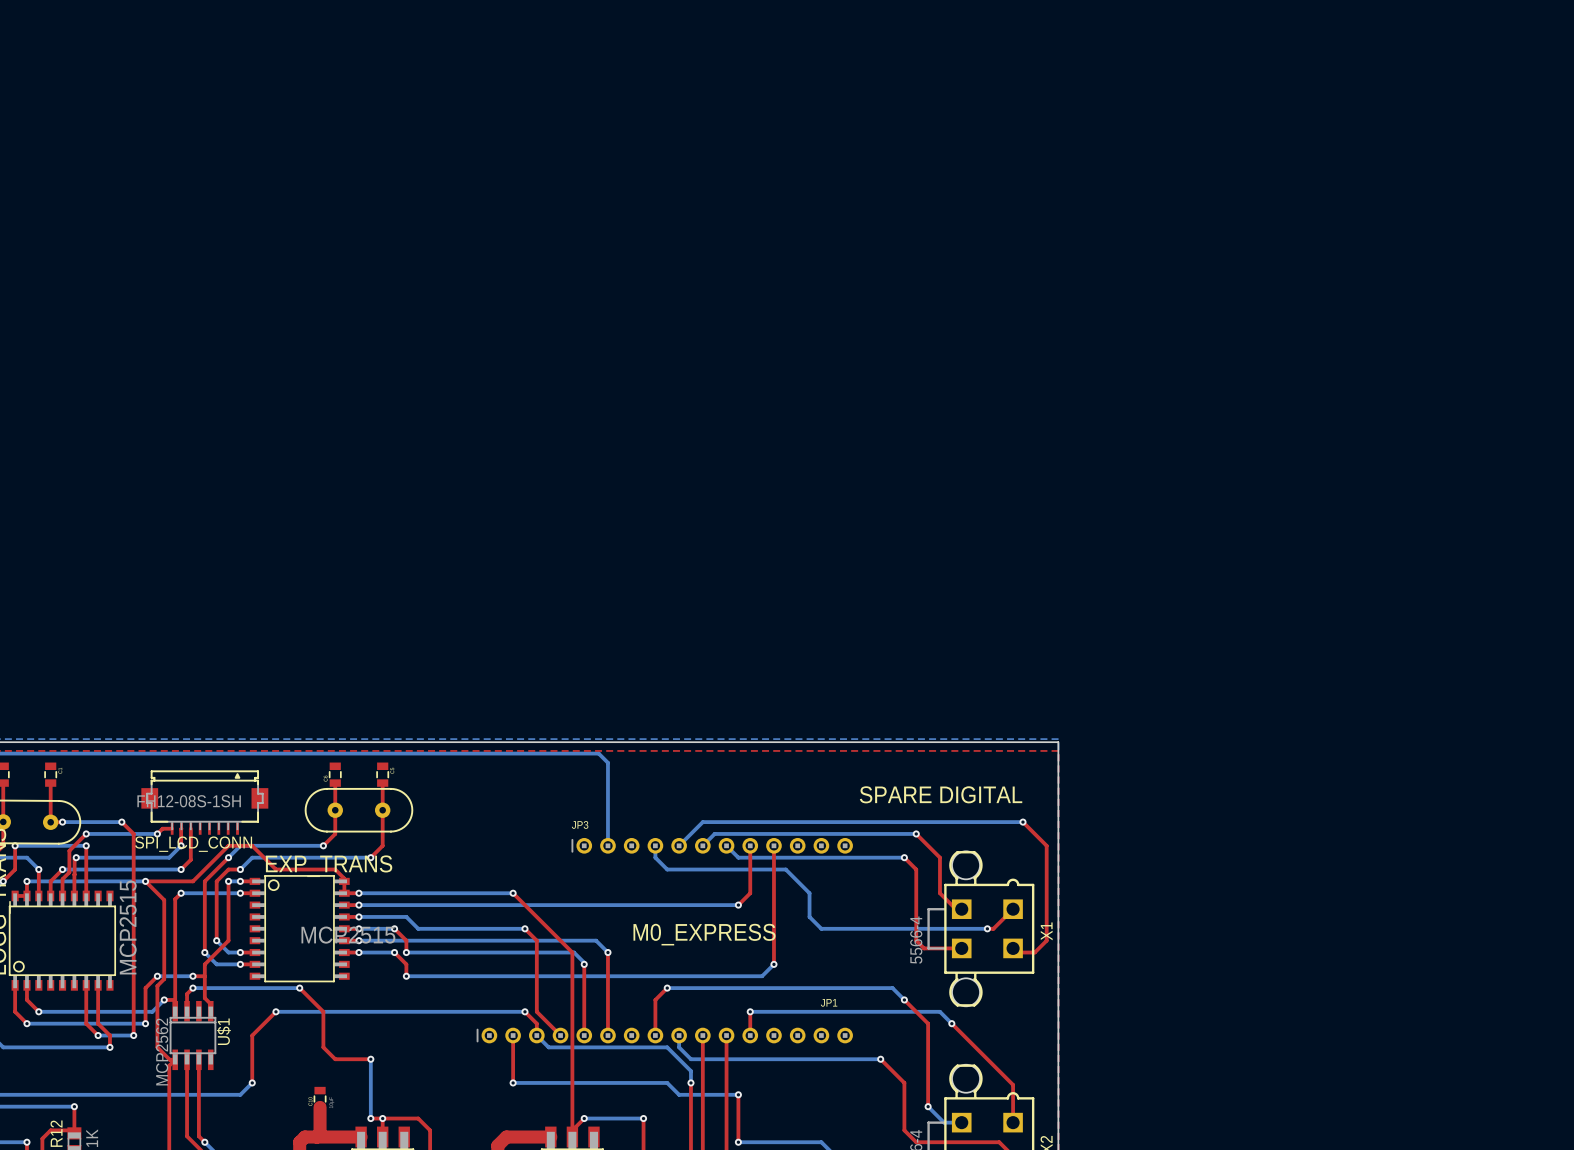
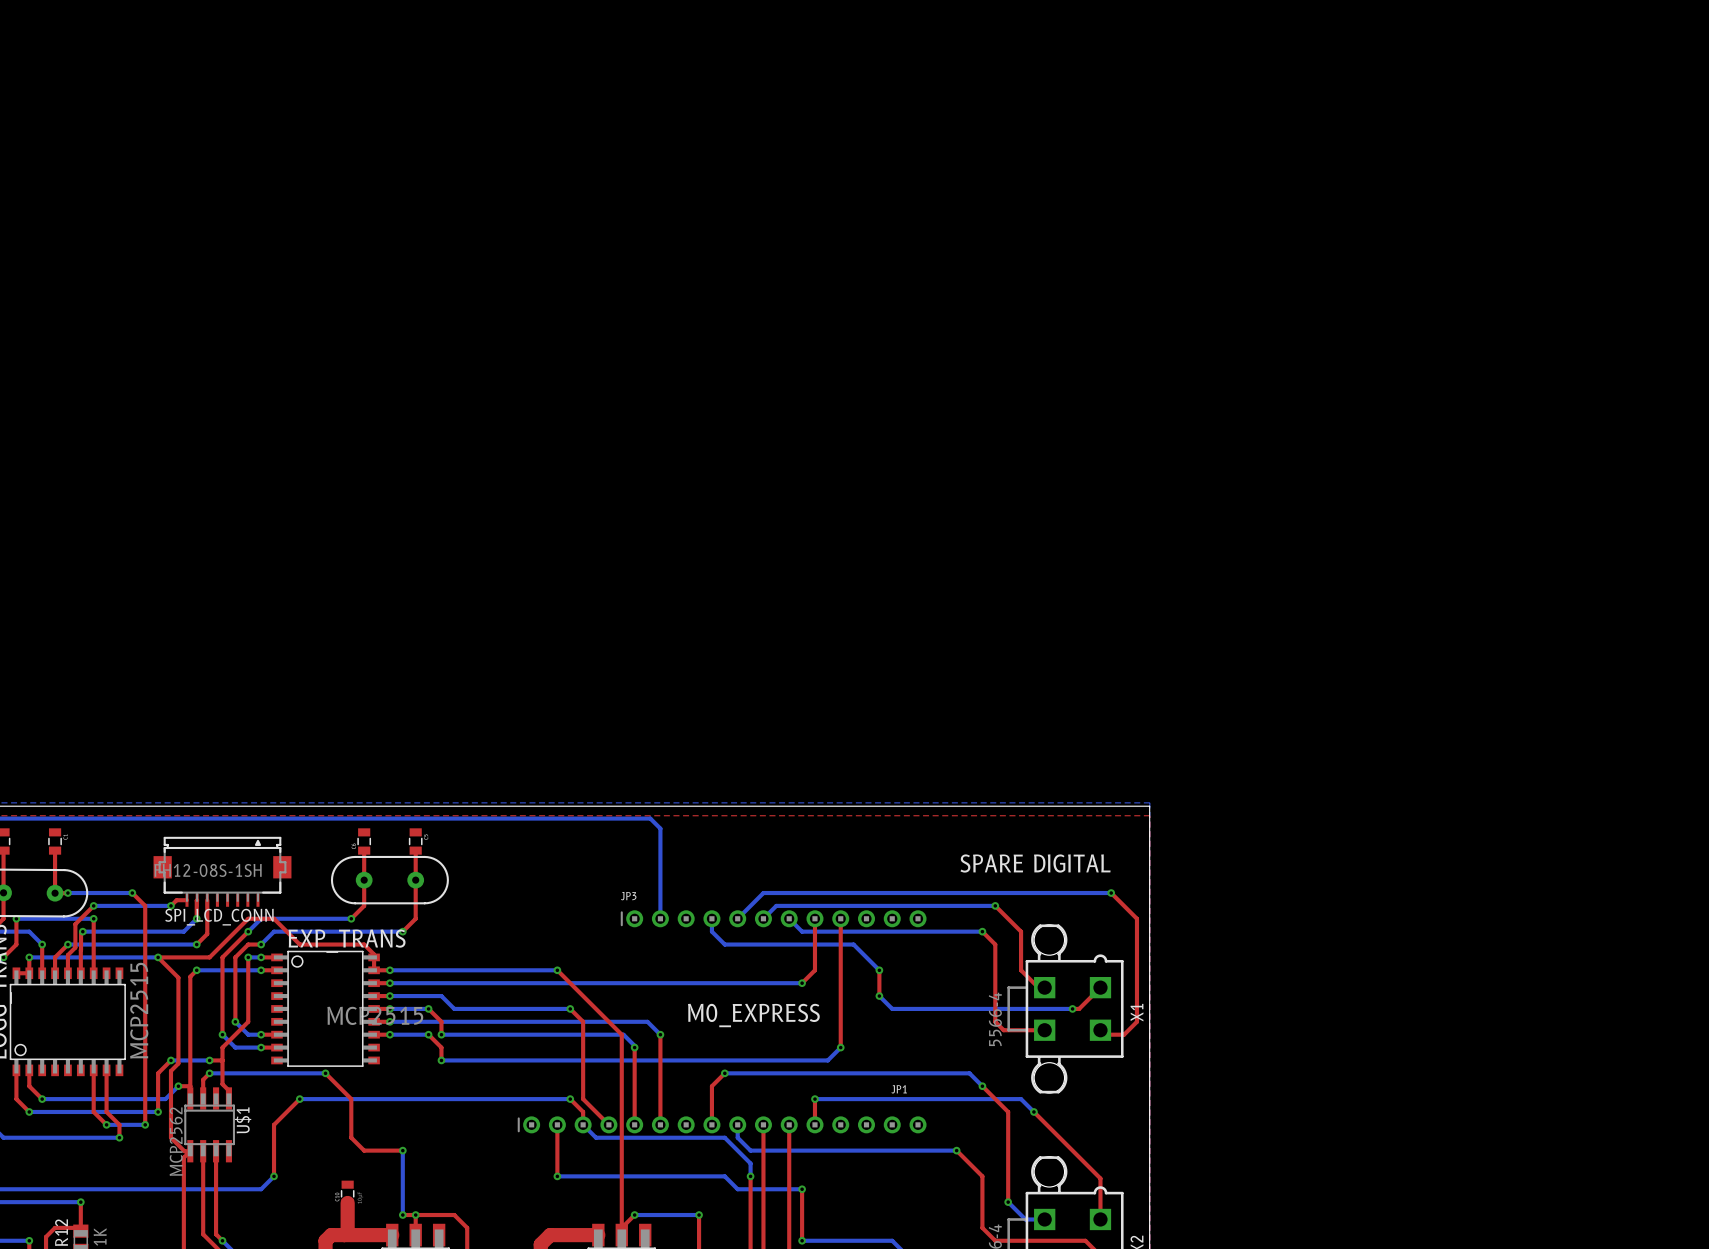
top track: none -> (879, 970) (879, 996)
bottom track: (809, 893) (809, 916) -> none
via: none -> (879, 970)
via: none -> (879, 996)

